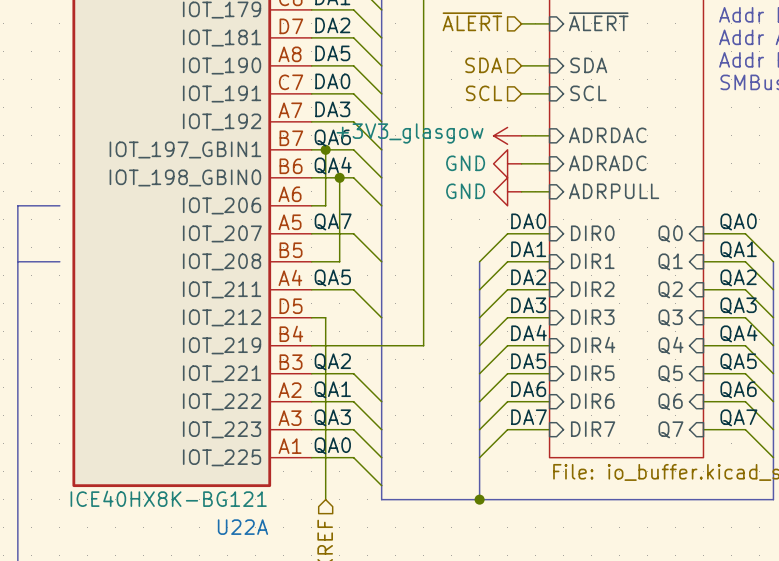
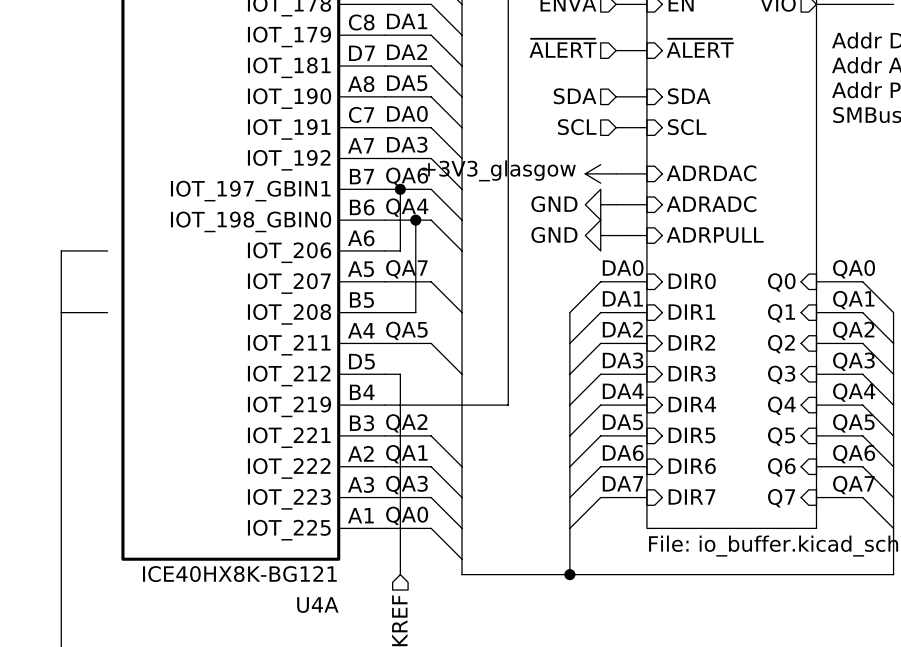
U22A name: U22A (242, 527) -> U4A (317, 605)

